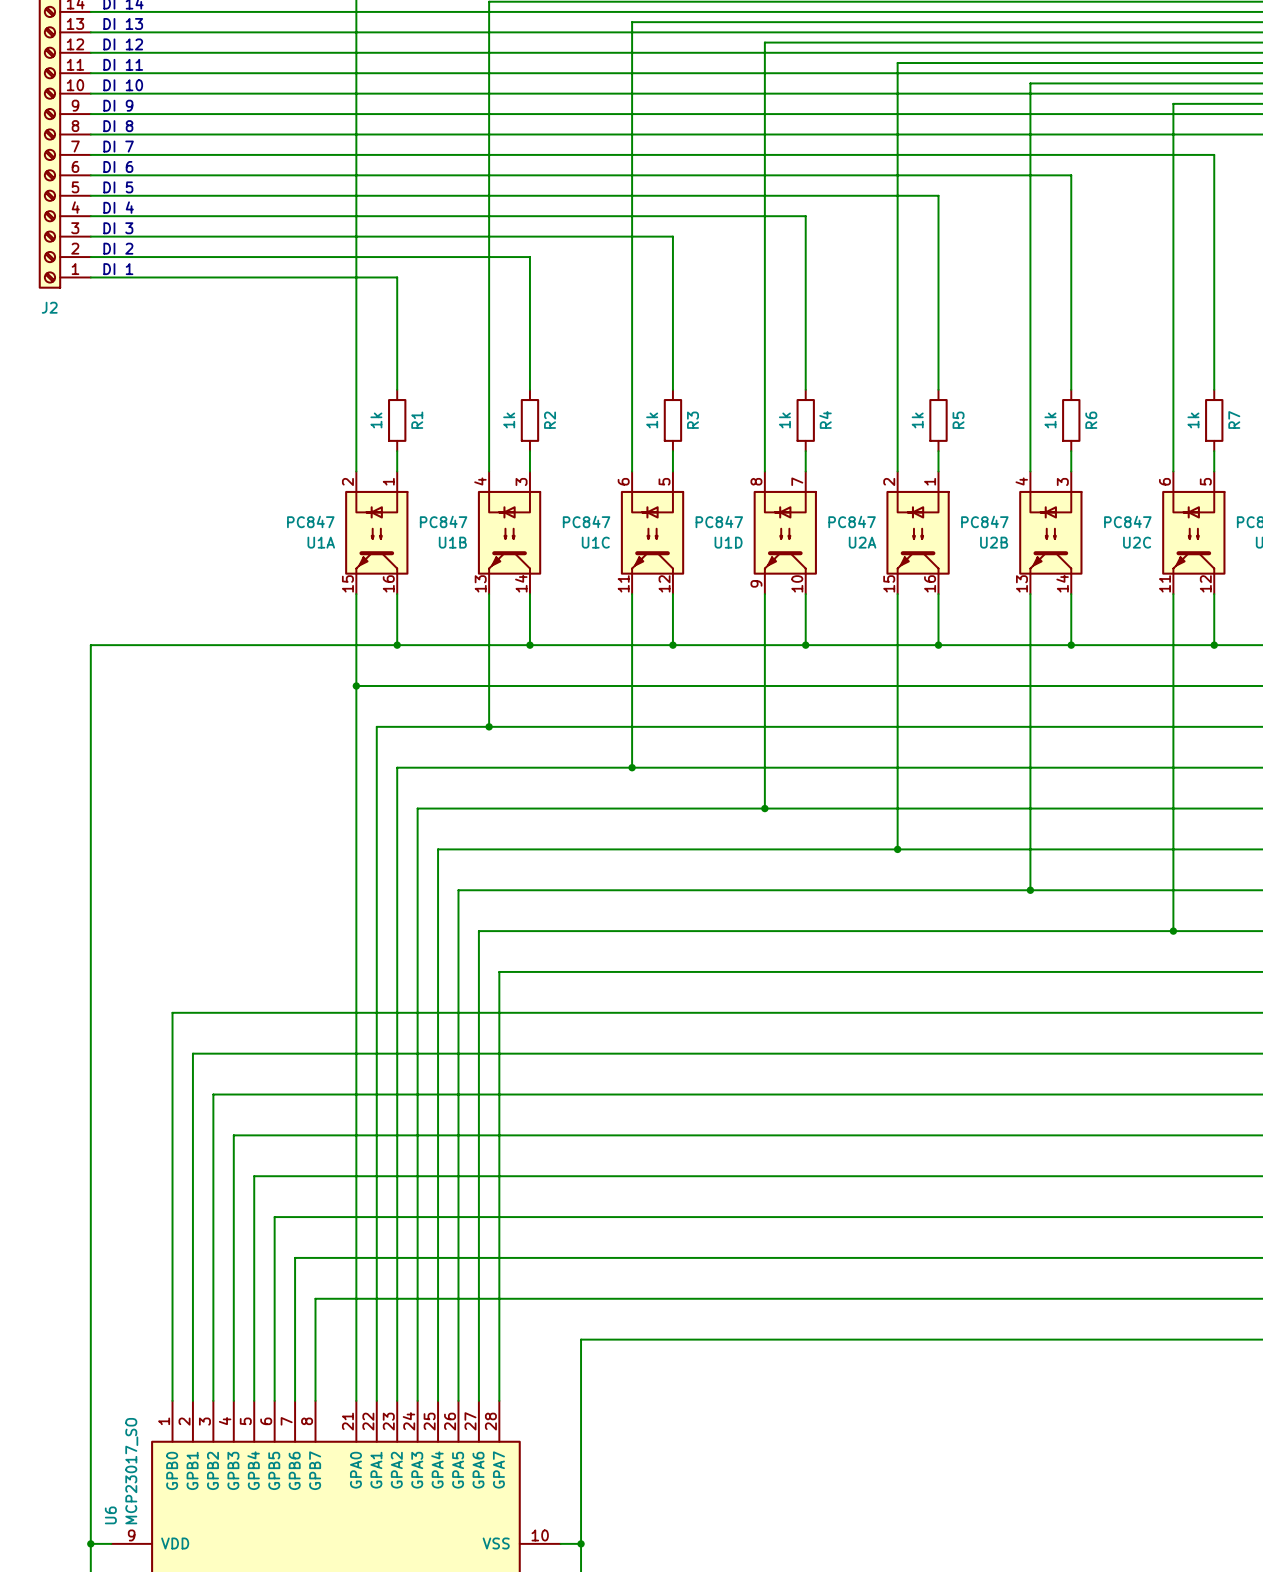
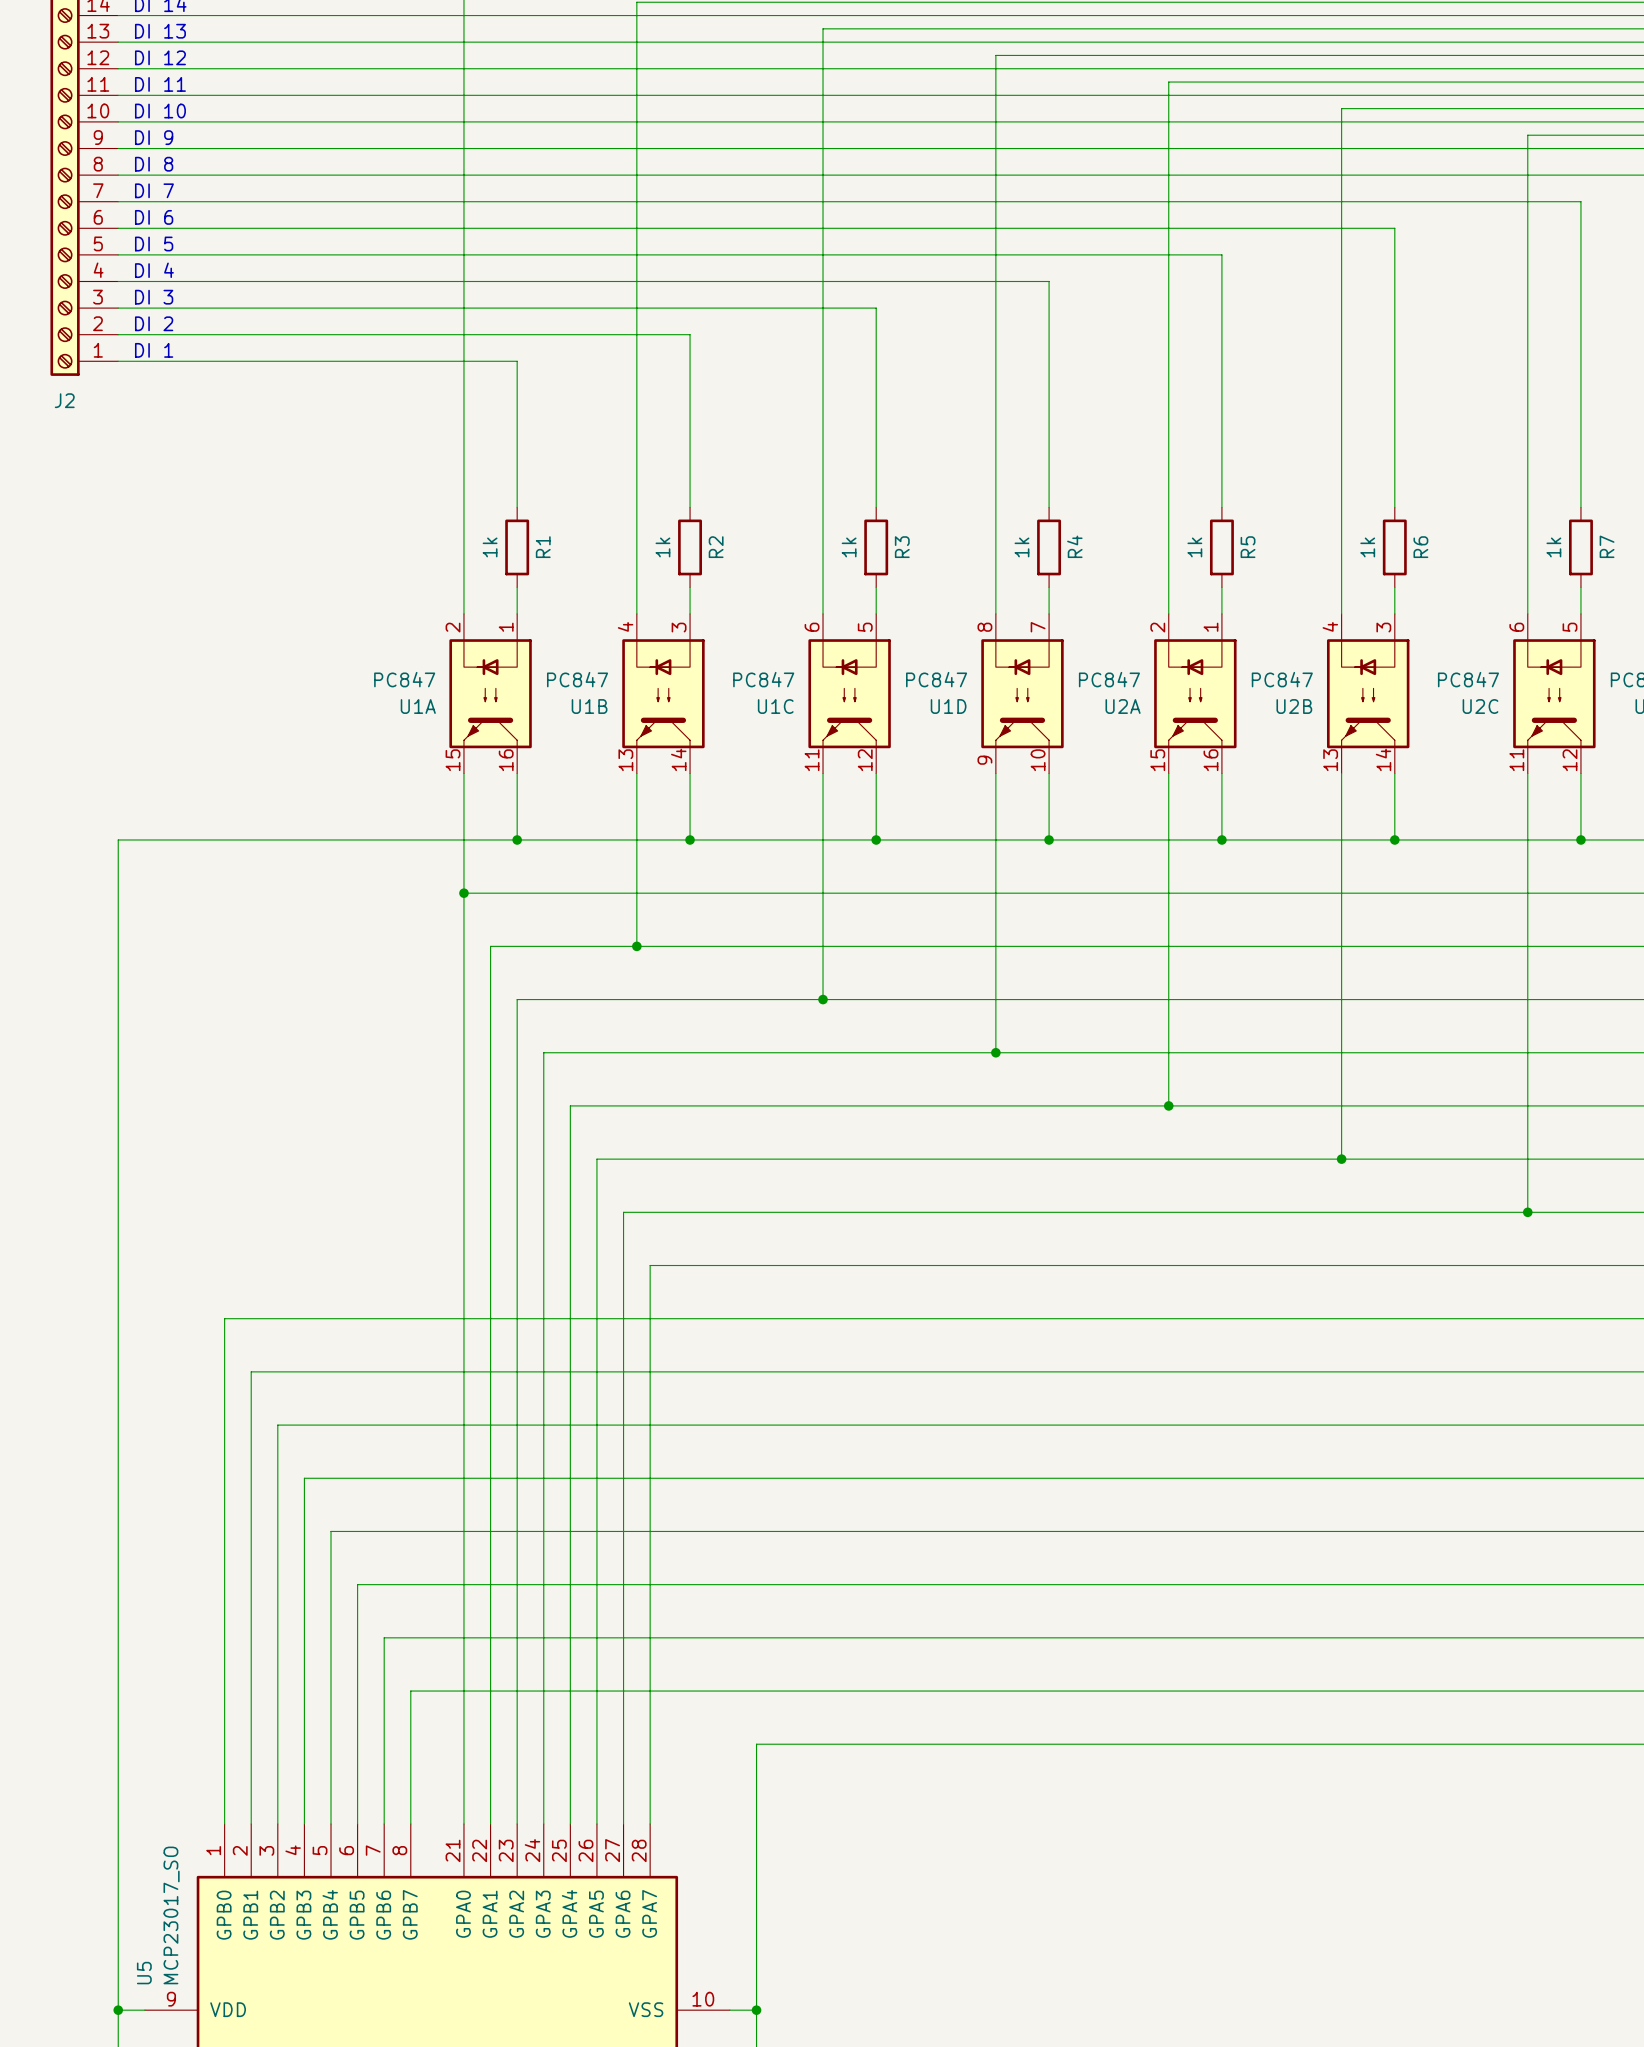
U6 name: U6 (110, 1515) -> U5 (144, 1973)

